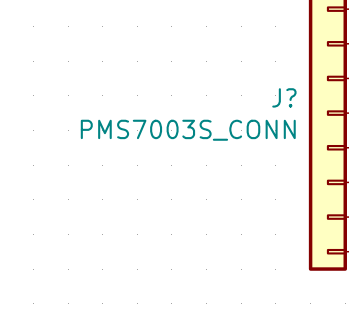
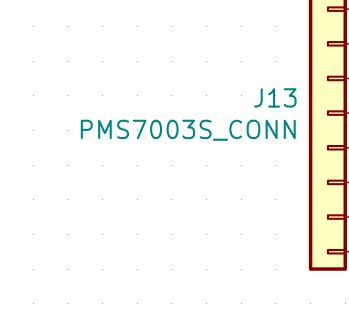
J? name: J? (284, 97) -> J13 (275, 97)

